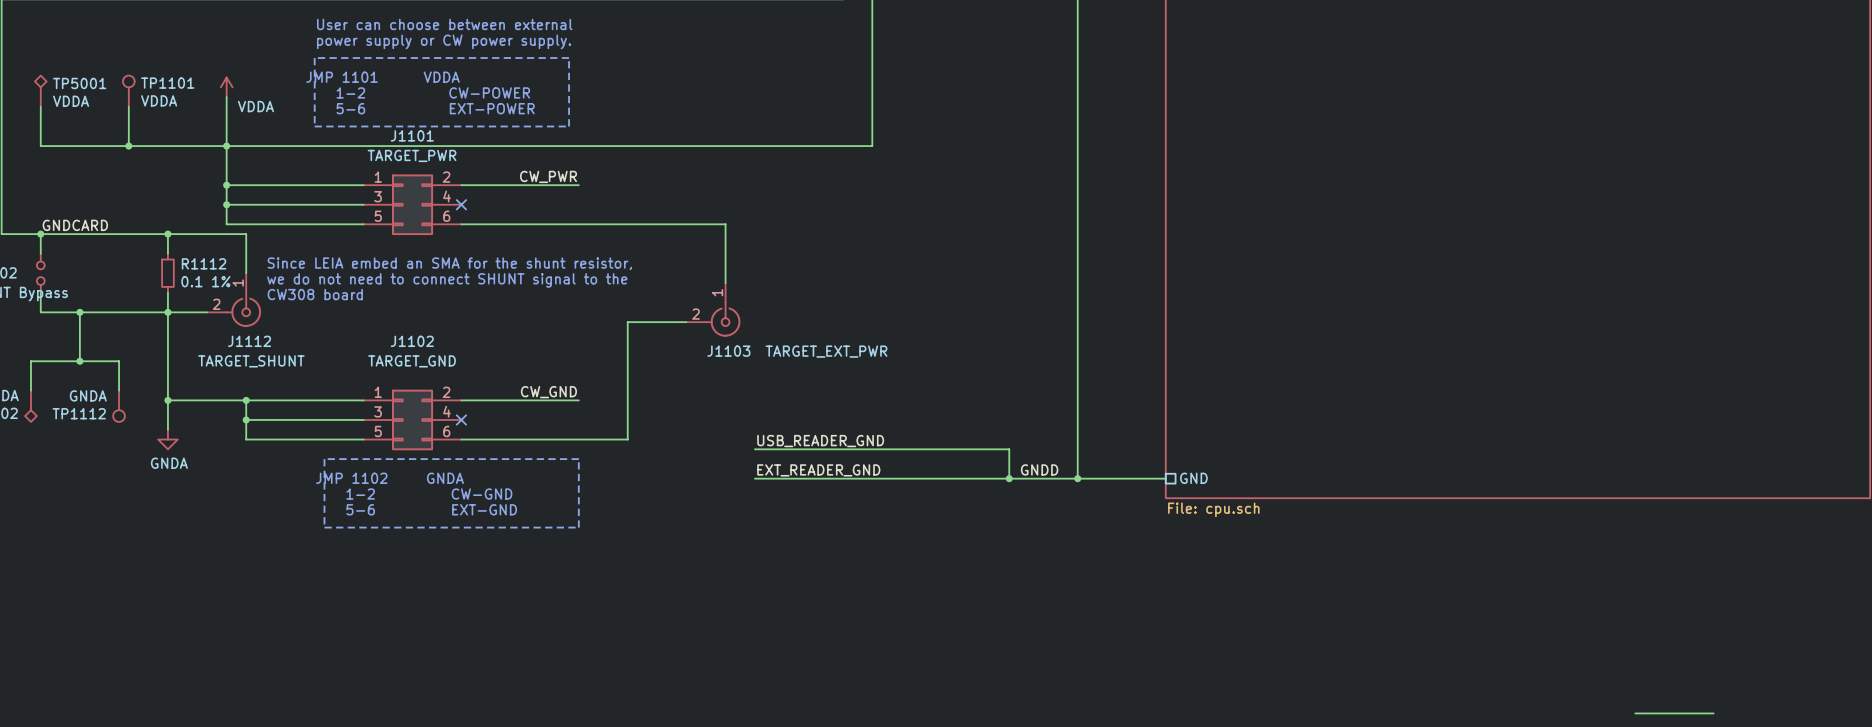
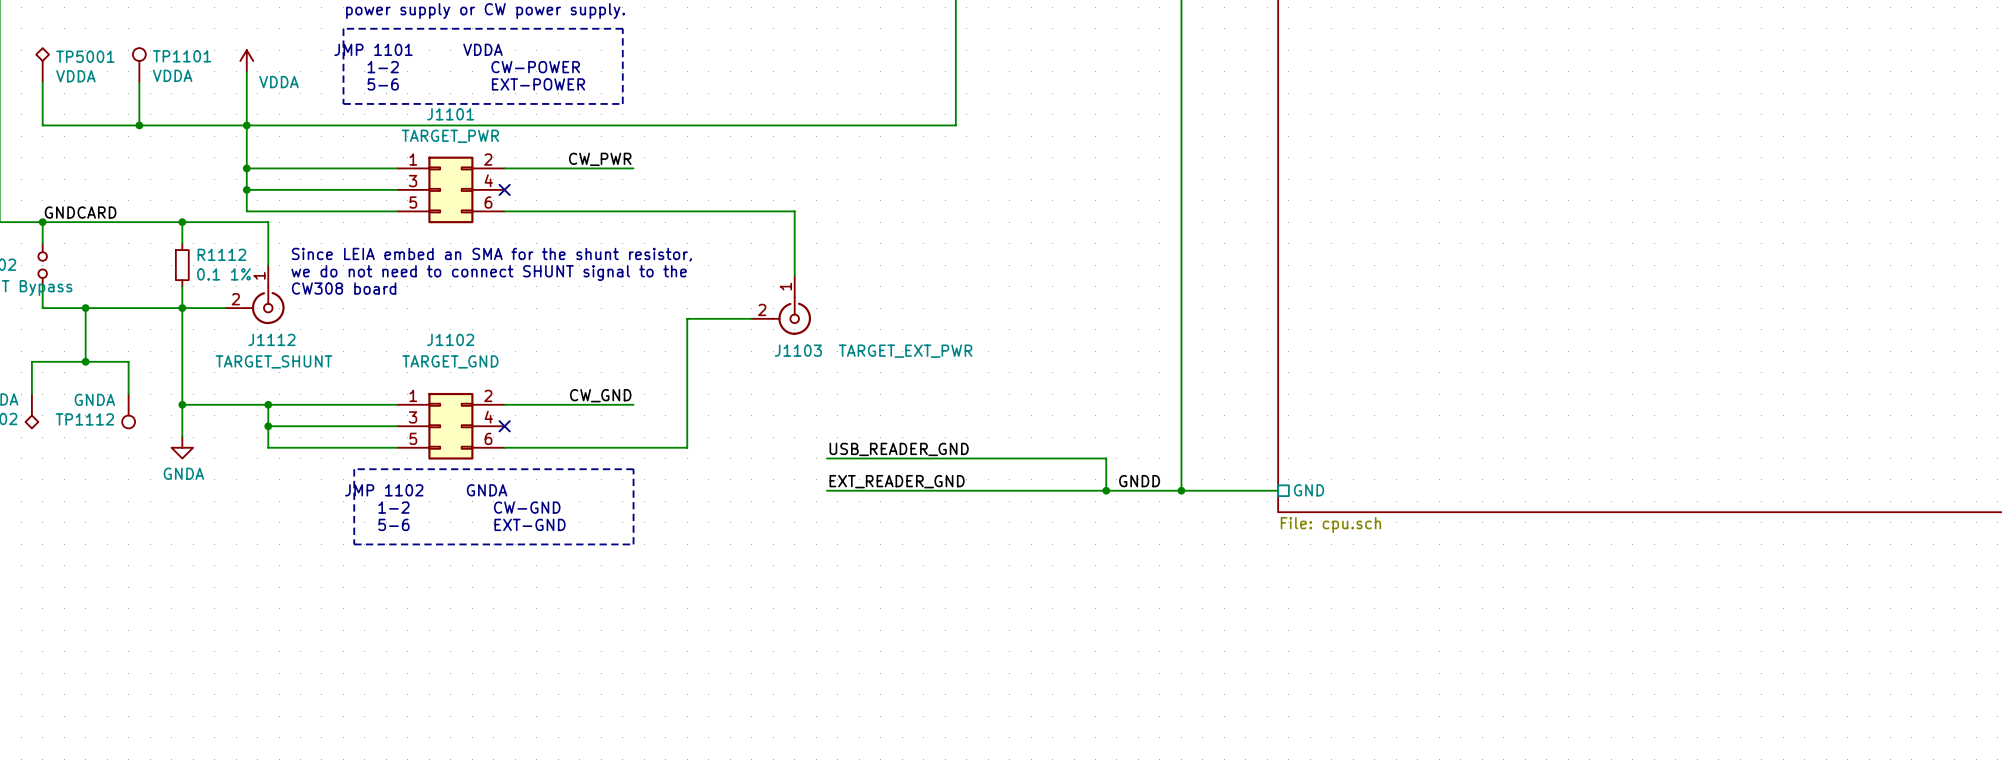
wire: (1635, 713) (1713, 713) -> none

